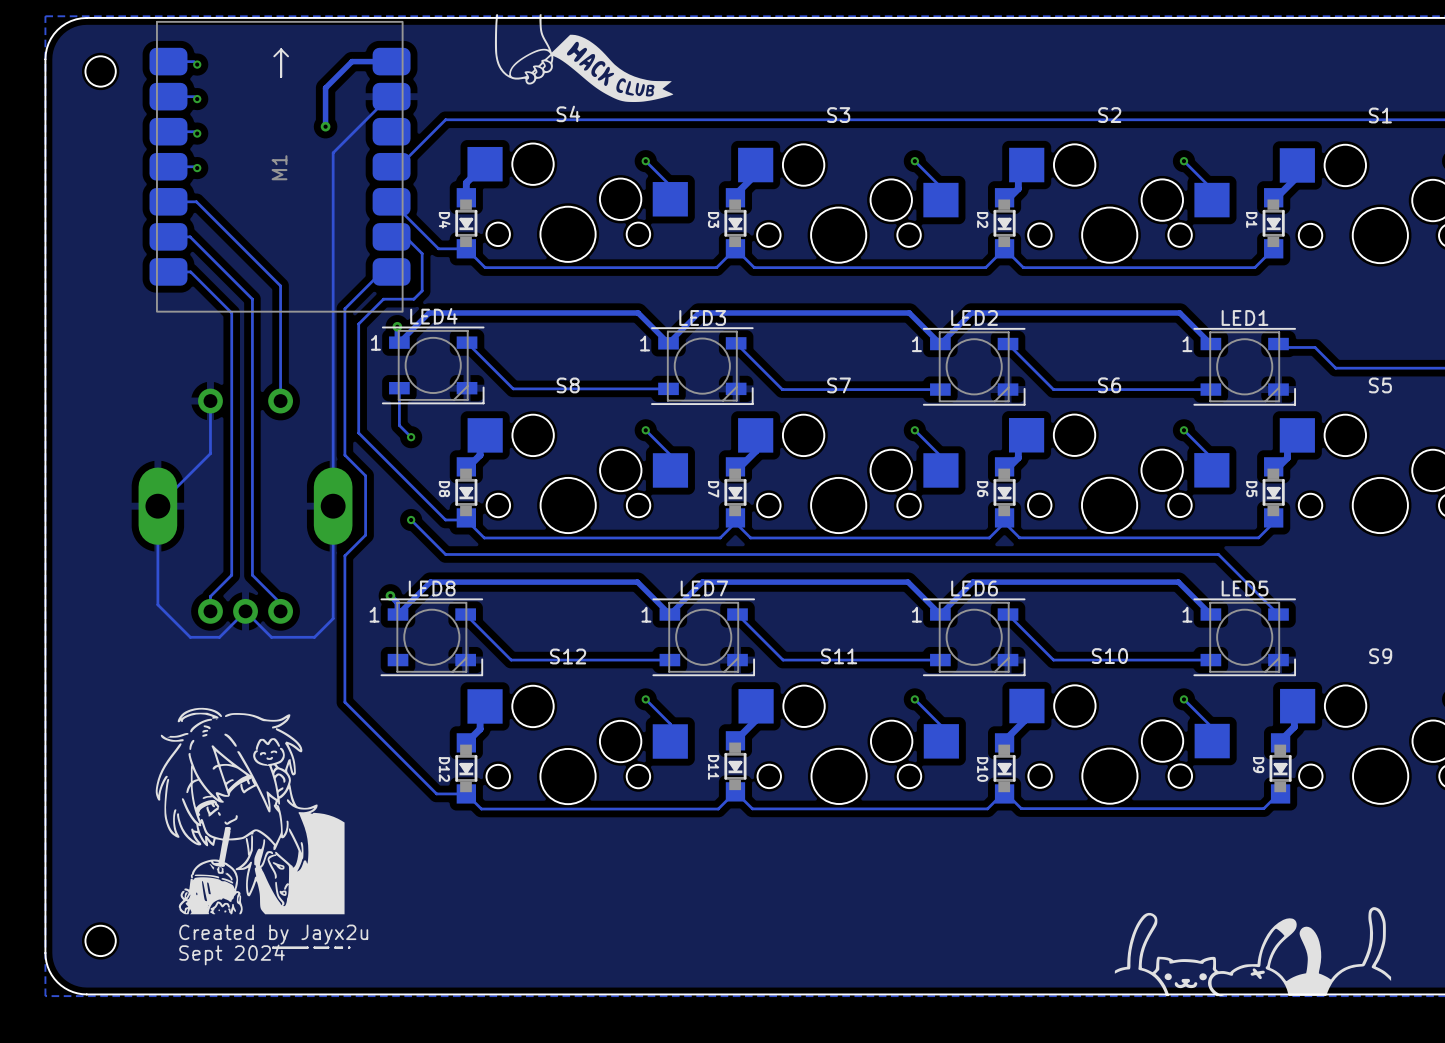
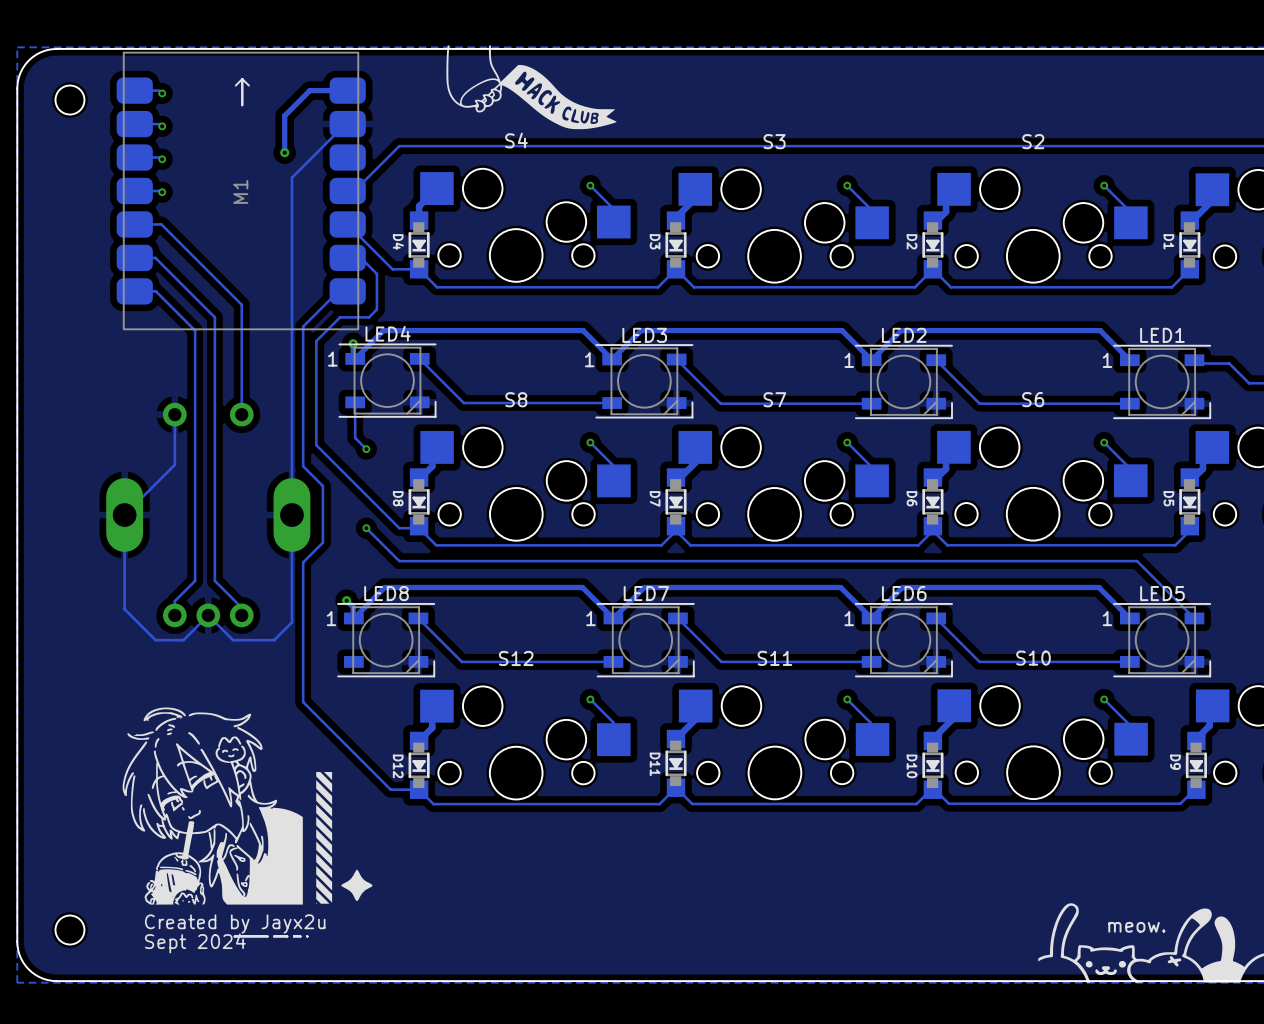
drawing: none -> [316, 771, 373, 904]
text: none -> meow. (1136, 927)

